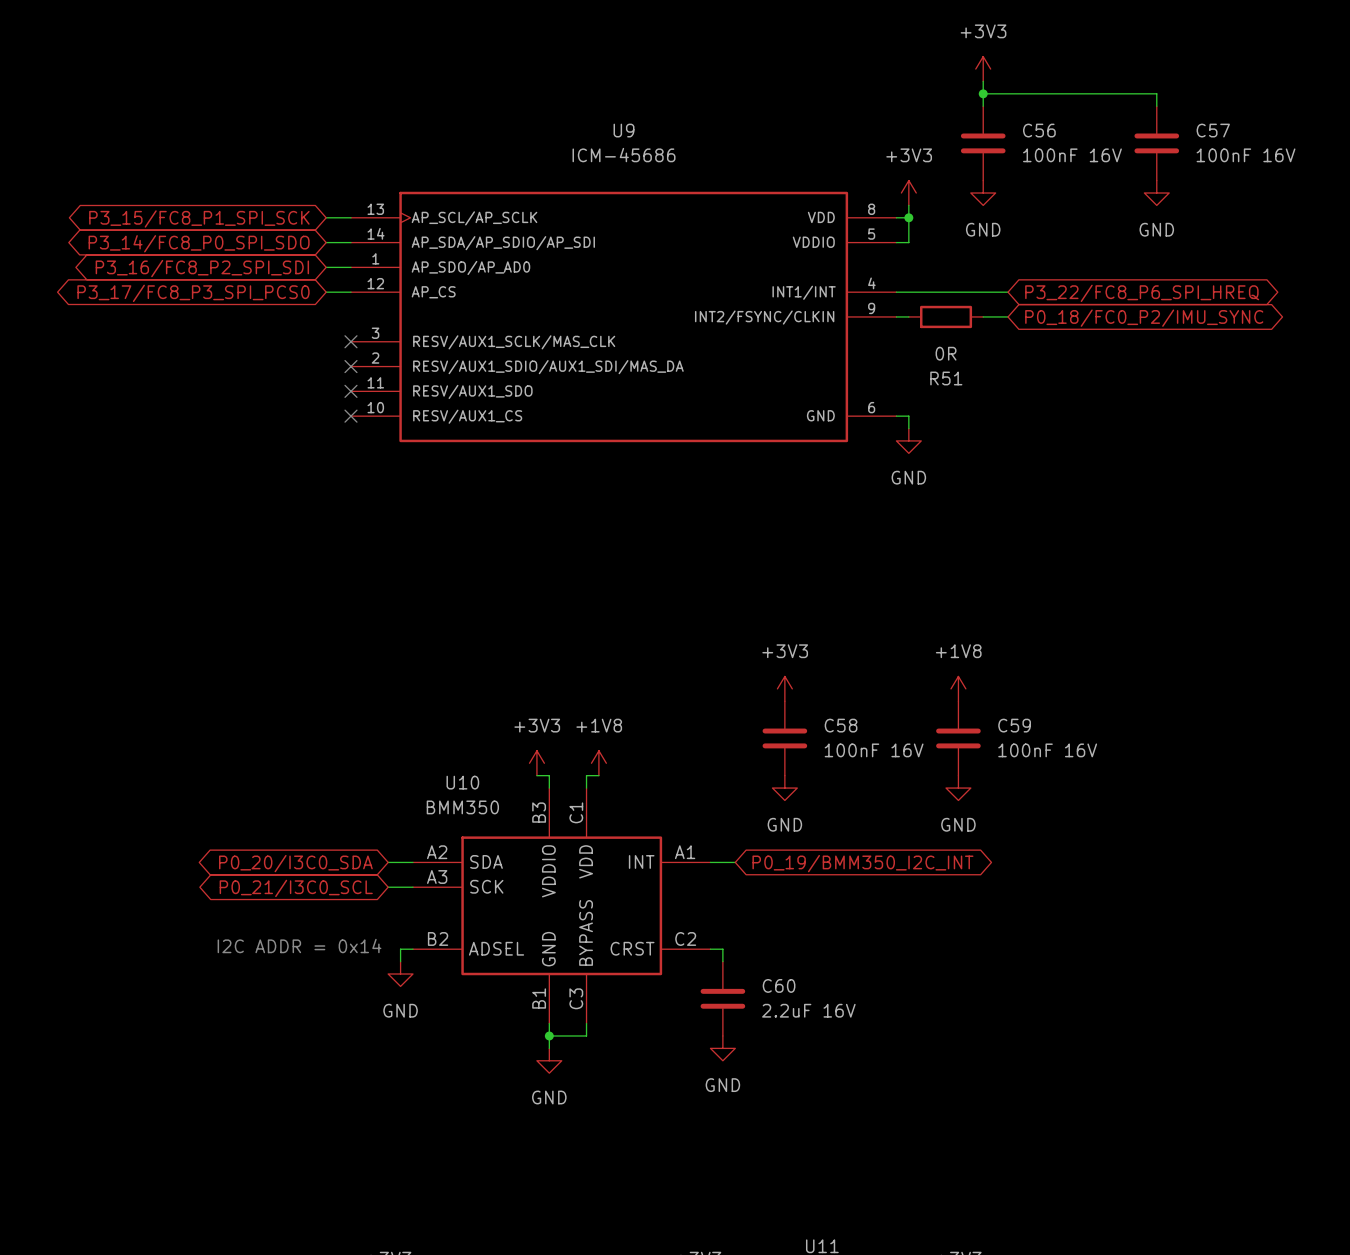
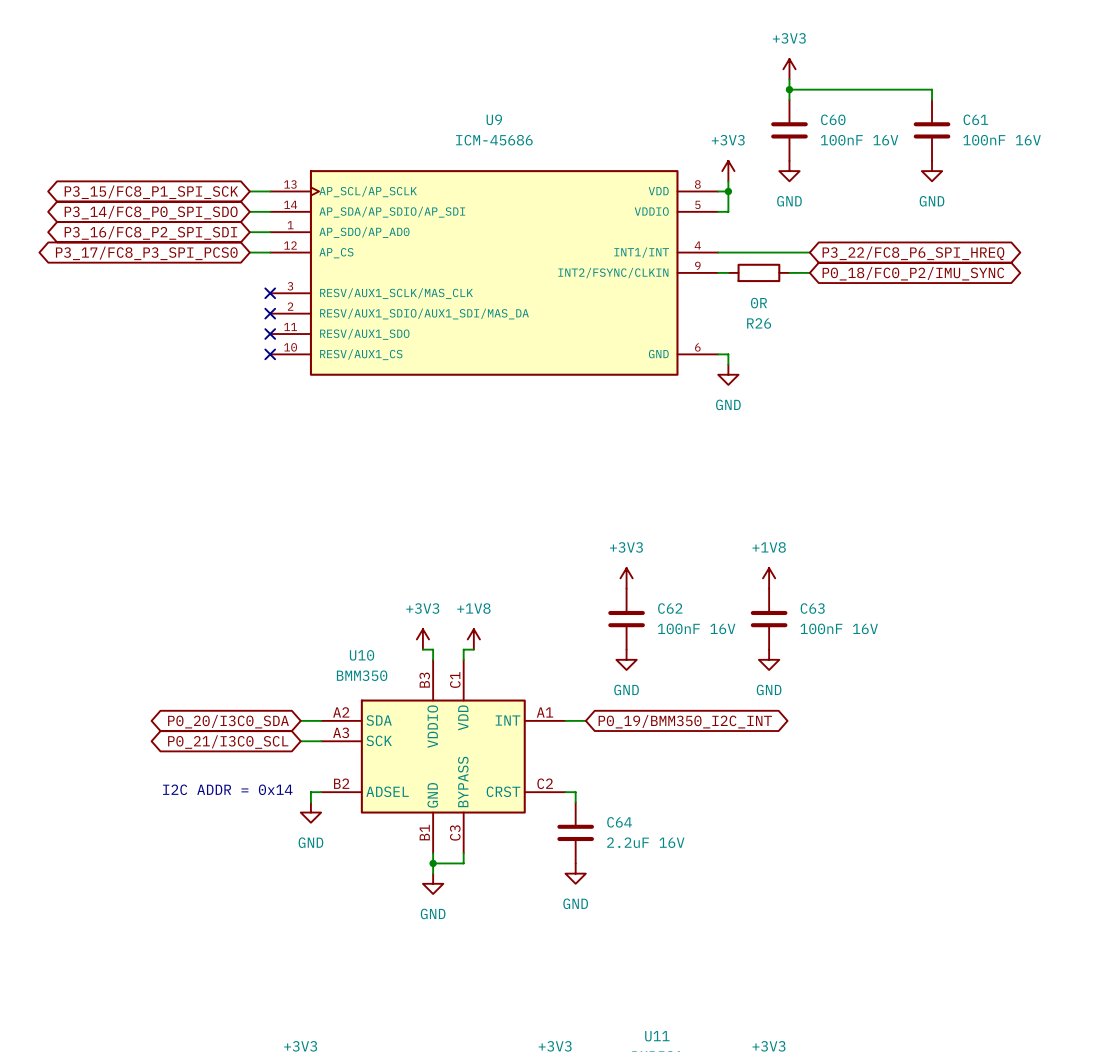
C56 name: C56 (1039, 130) -> C60 (833, 119)
C57 name: C57 (1213, 130) -> C61 (975, 119)
R51 name: R51 (946, 378) -> R26 (759, 323)
C58 name: C58 (841, 725) -> C62 (670, 608)
C59 name: C59 (1014, 725) -> C63 (812, 608)
C60 name: C60 (779, 985) -> C64 (619, 822)

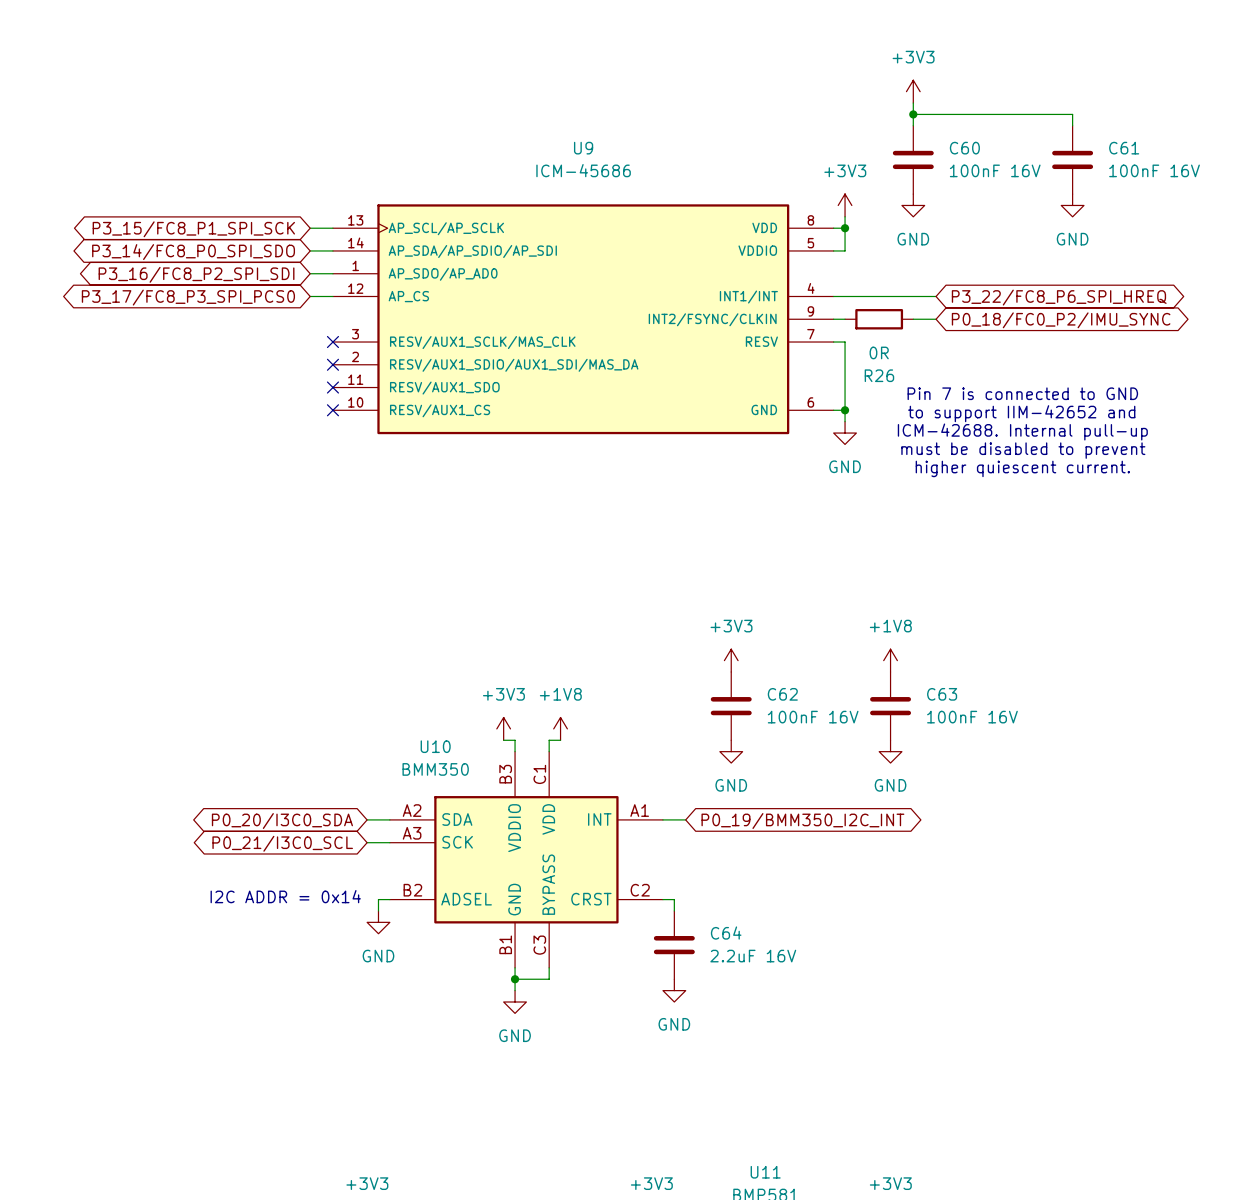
U9 symbol: [270, 170, 719, 376] -> [332, 204, 834, 435]
wire: none -> (833, 342) (845, 342) (845, 410)
text: none -> Pin 7 is connected to GND (1022, 393)
junction: none -> (845, 410)
text: none -> to support IIM-42652 and (1021, 413)
text: none -> ICM-42688. Internal pull-up (1022, 432)
text: none -> must be disabled to prevent (1023, 450)
text: none -> higher quiescent current. (1022, 468)

